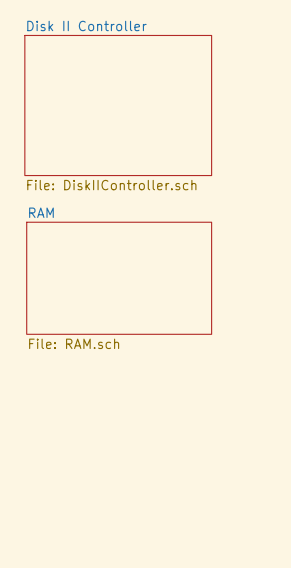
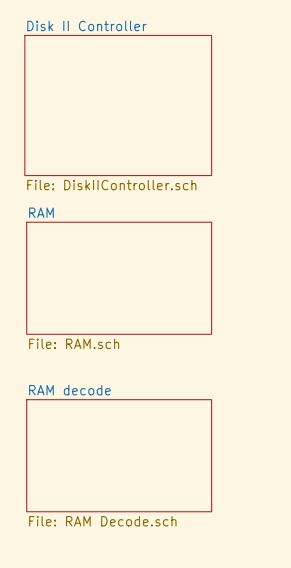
sheet RAM decode: none -> File: RAM Decode.sch (119, 455)

